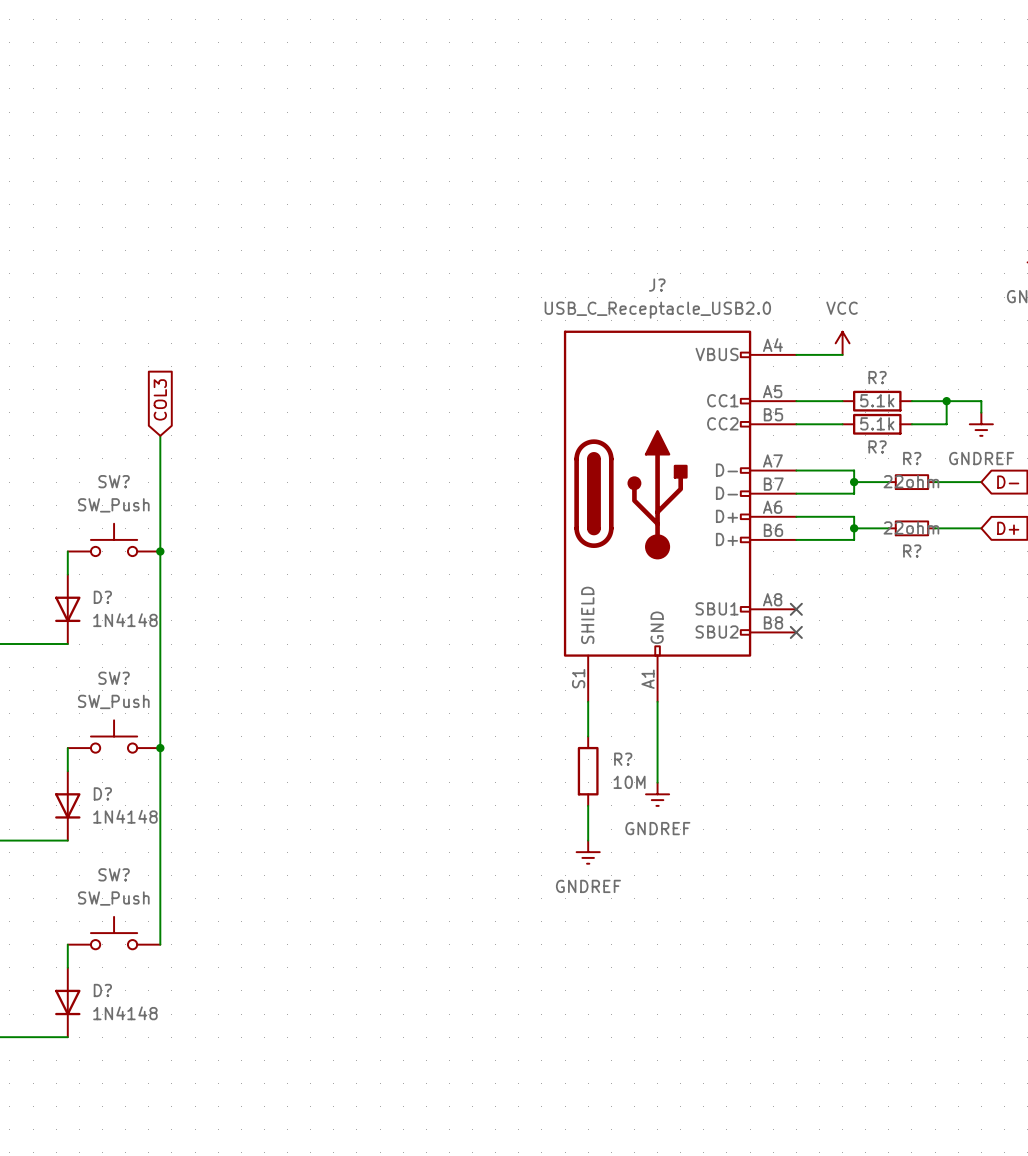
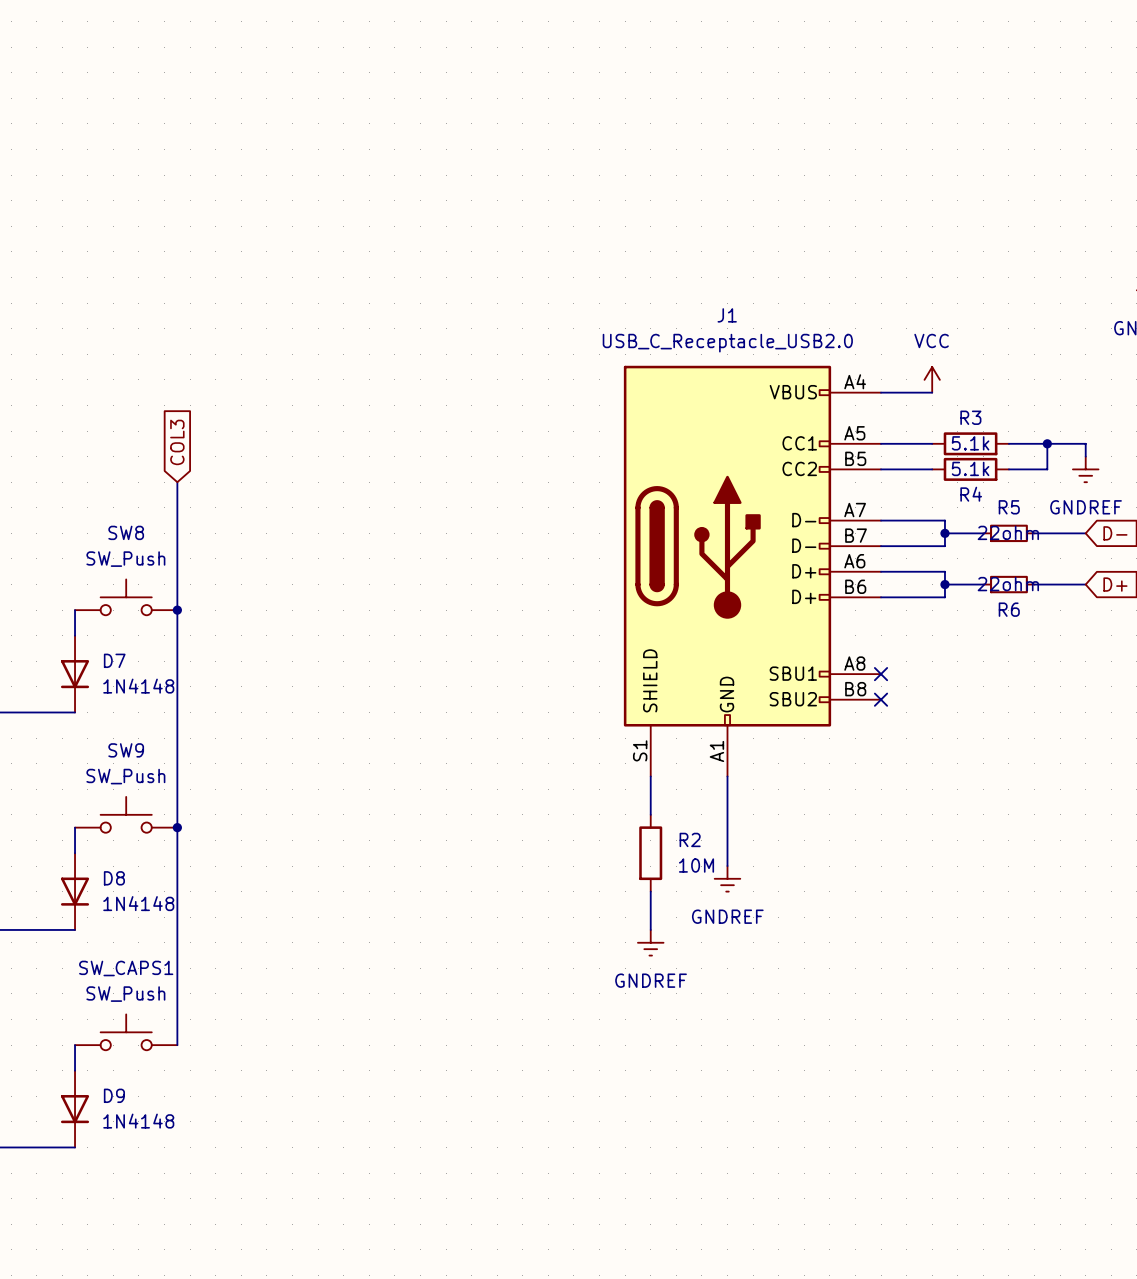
J? name: J? (657, 285) -> J1 (727, 315)
R? name: R? (877, 377) -> R3 (970, 417)
R? name: R? (877, 446) -> R4 (971, 494)
R? name: R? (912, 458) -> R5 (1009, 507)
SW? name: SW? (114, 481) -> SW8 (126, 532)
R? name: R? (912, 551) -> R6 (1009, 609)
D? name: D? (102, 597) -> D7 (114, 660)
SW? name: SW? (114, 678) -> SW9 (126, 750)
R? name: R? (623, 759) -> R2 (690, 839)
D? name: D? (102, 793) -> D8 (114, 878)
SW? name: SW? (114, 874) -> SW_CAPS1 (126, 968)
D? name: D? (102, 990) -> D9 (114, 1095)

